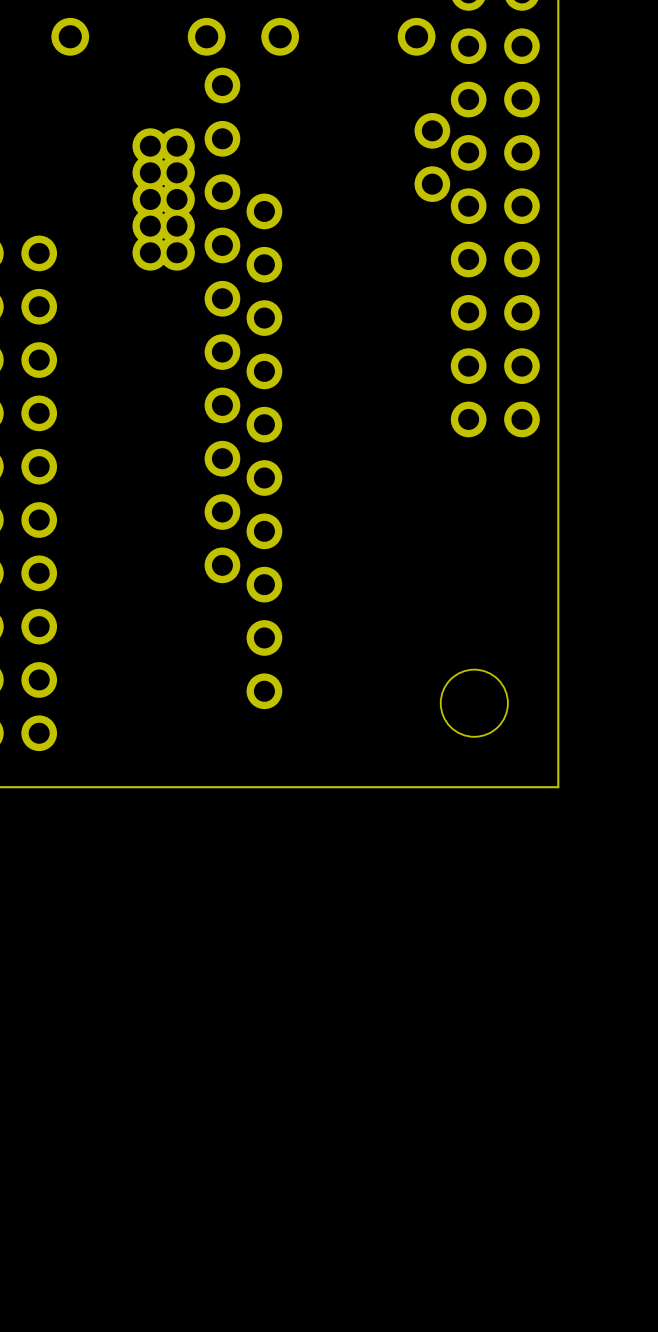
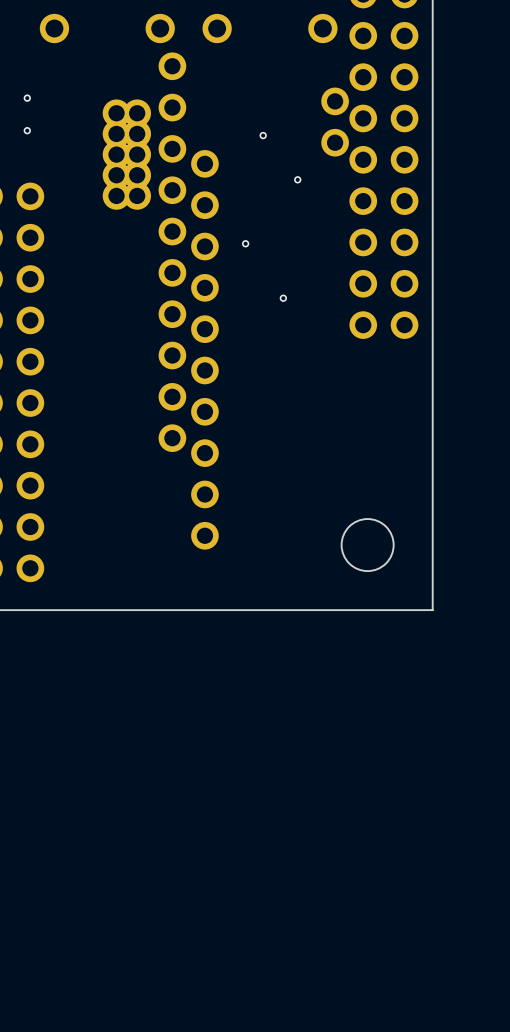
via: none -> (27, 98)
via: none -> (27, 130)
via: none -> (263, 135)
via: none -> (297, 179)
via: none -> (245, 243)
via: none -> (283, 298)

